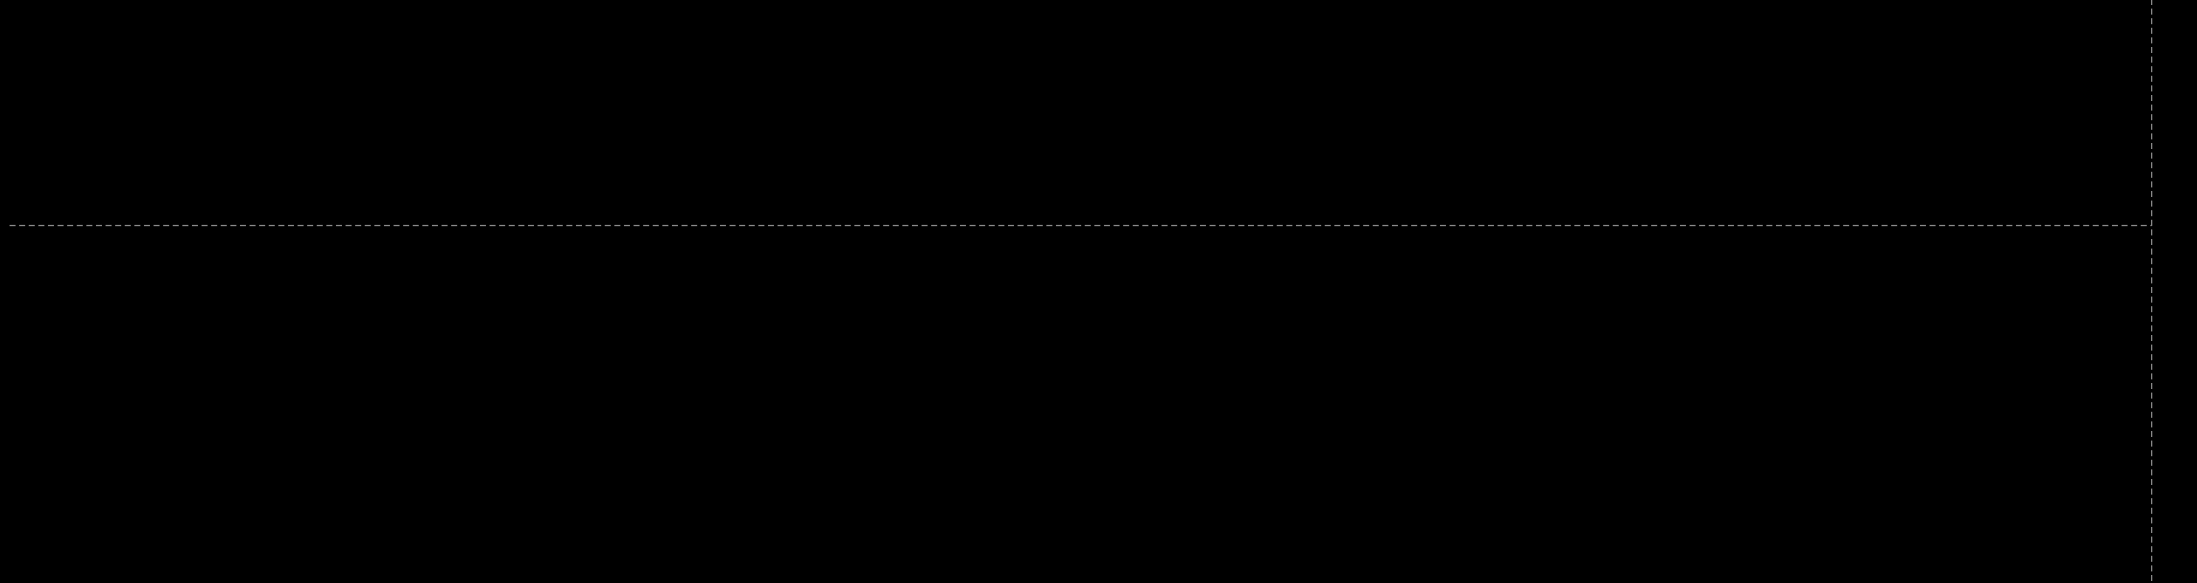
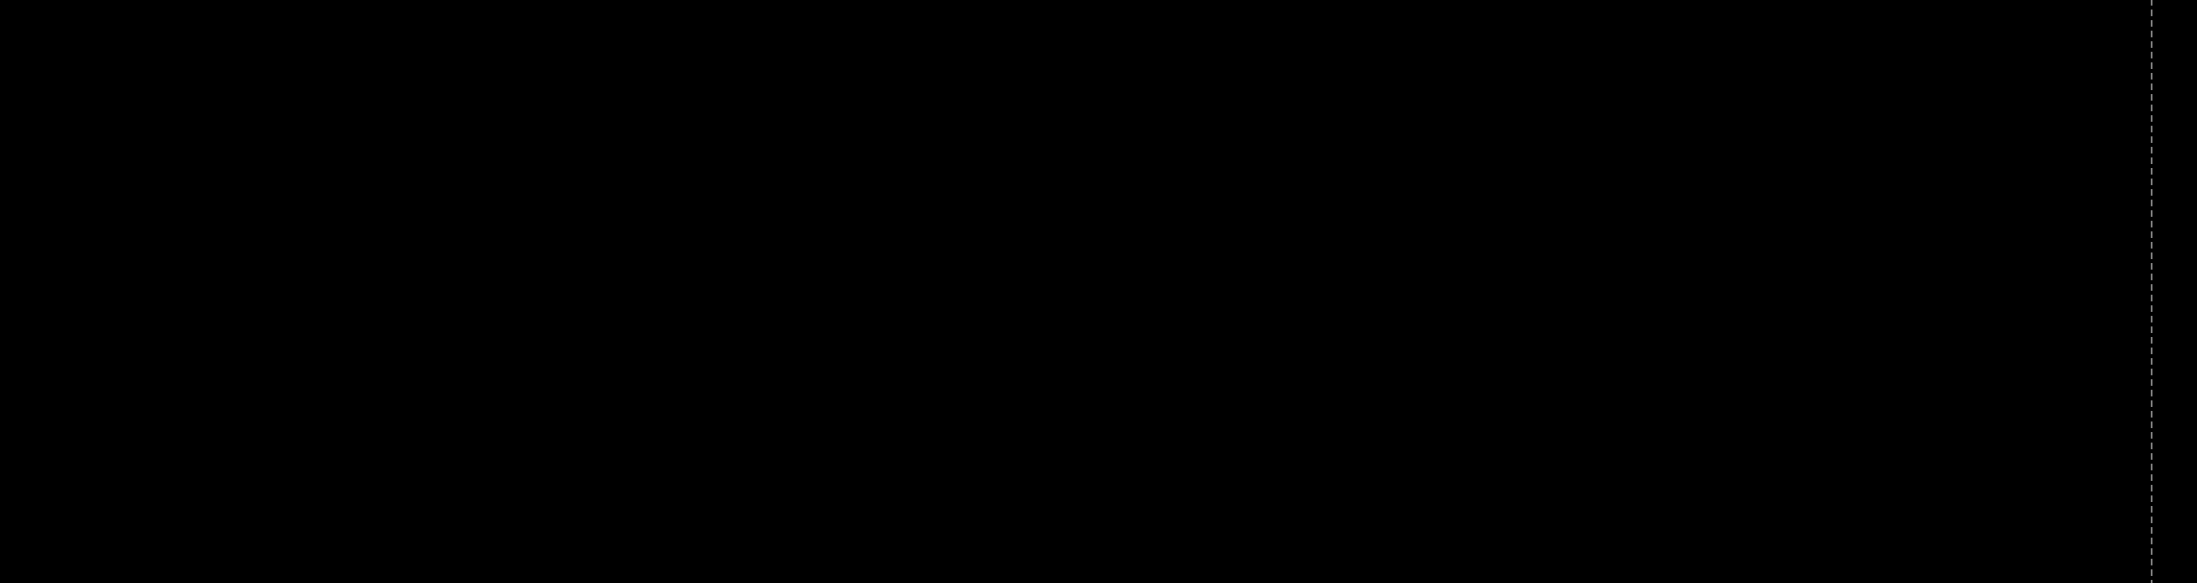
line: (9, 225) (2151, 225) -> none

